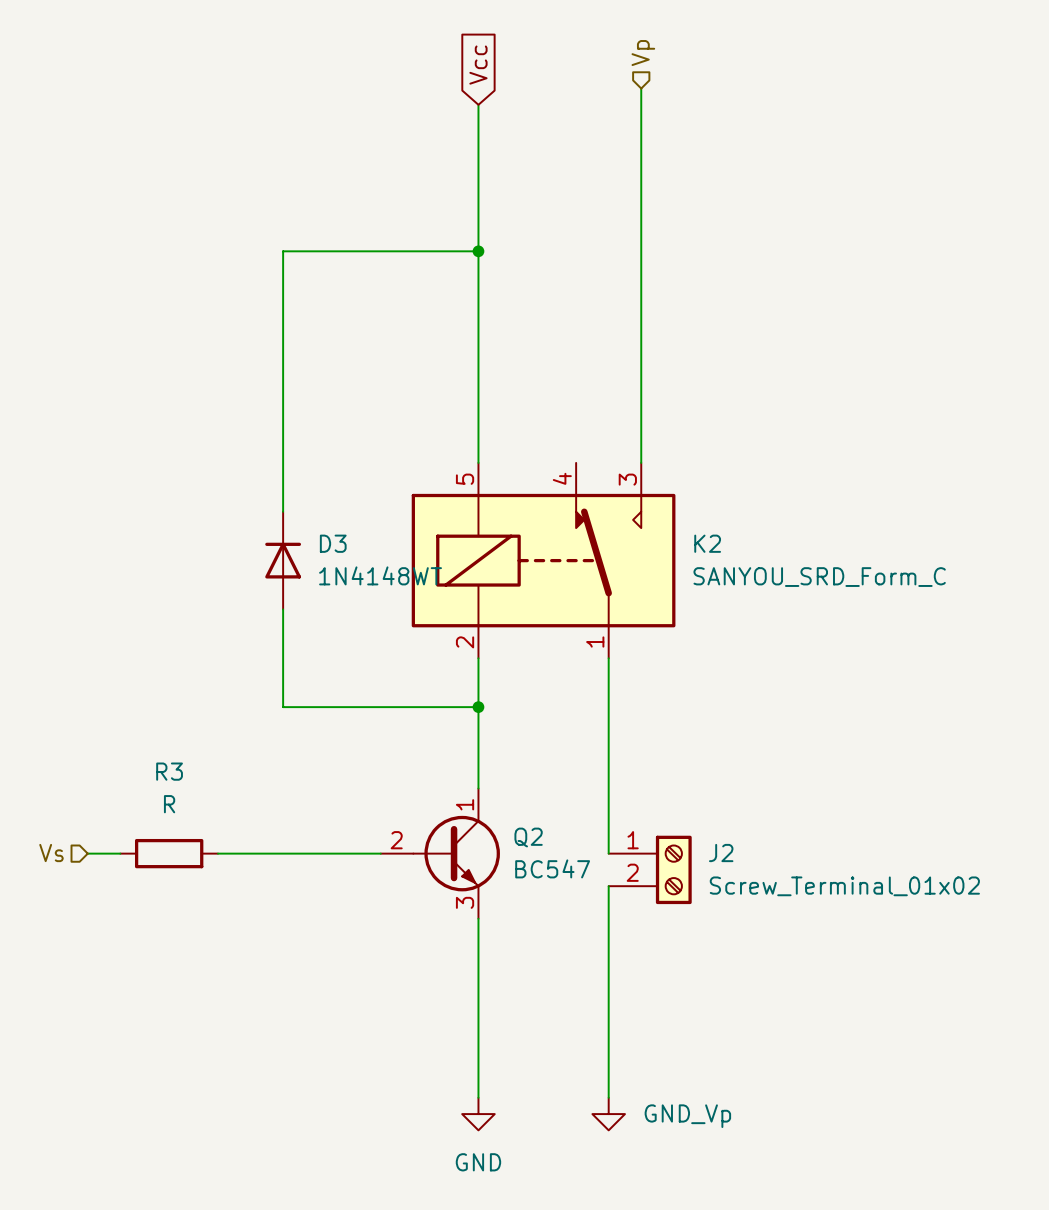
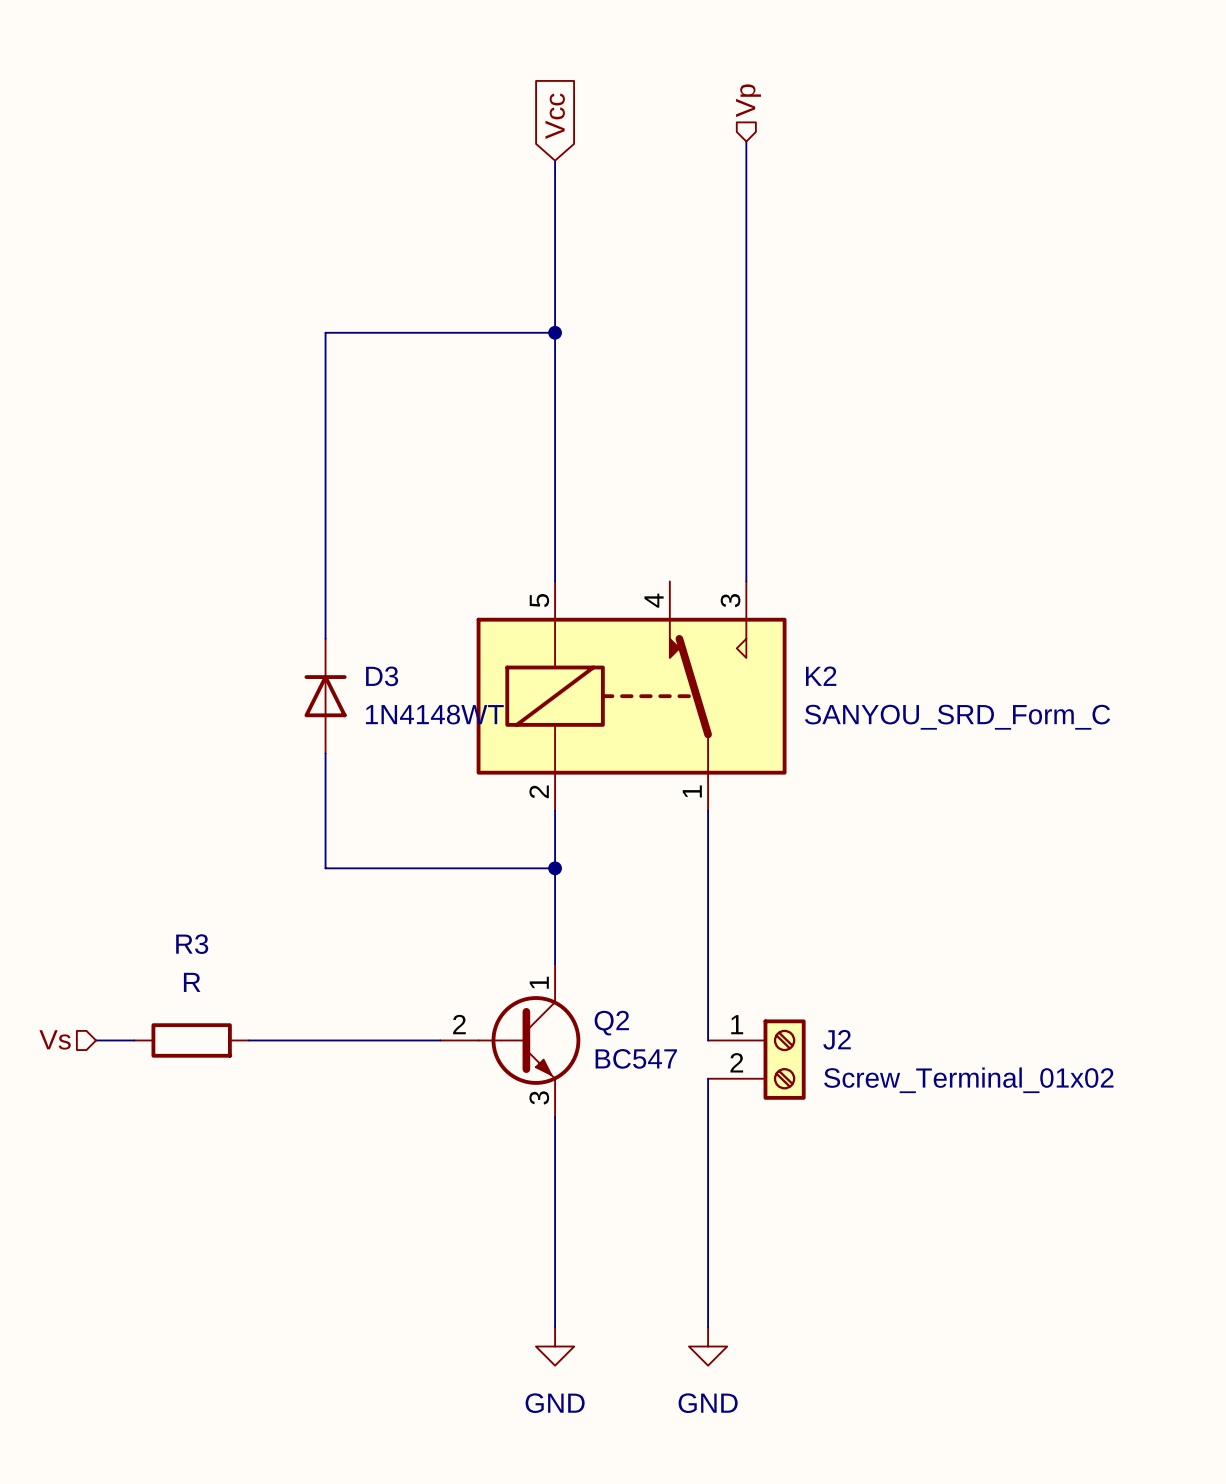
power symbol: GND_Vp (608, 1114) -> GND (708, 1346)

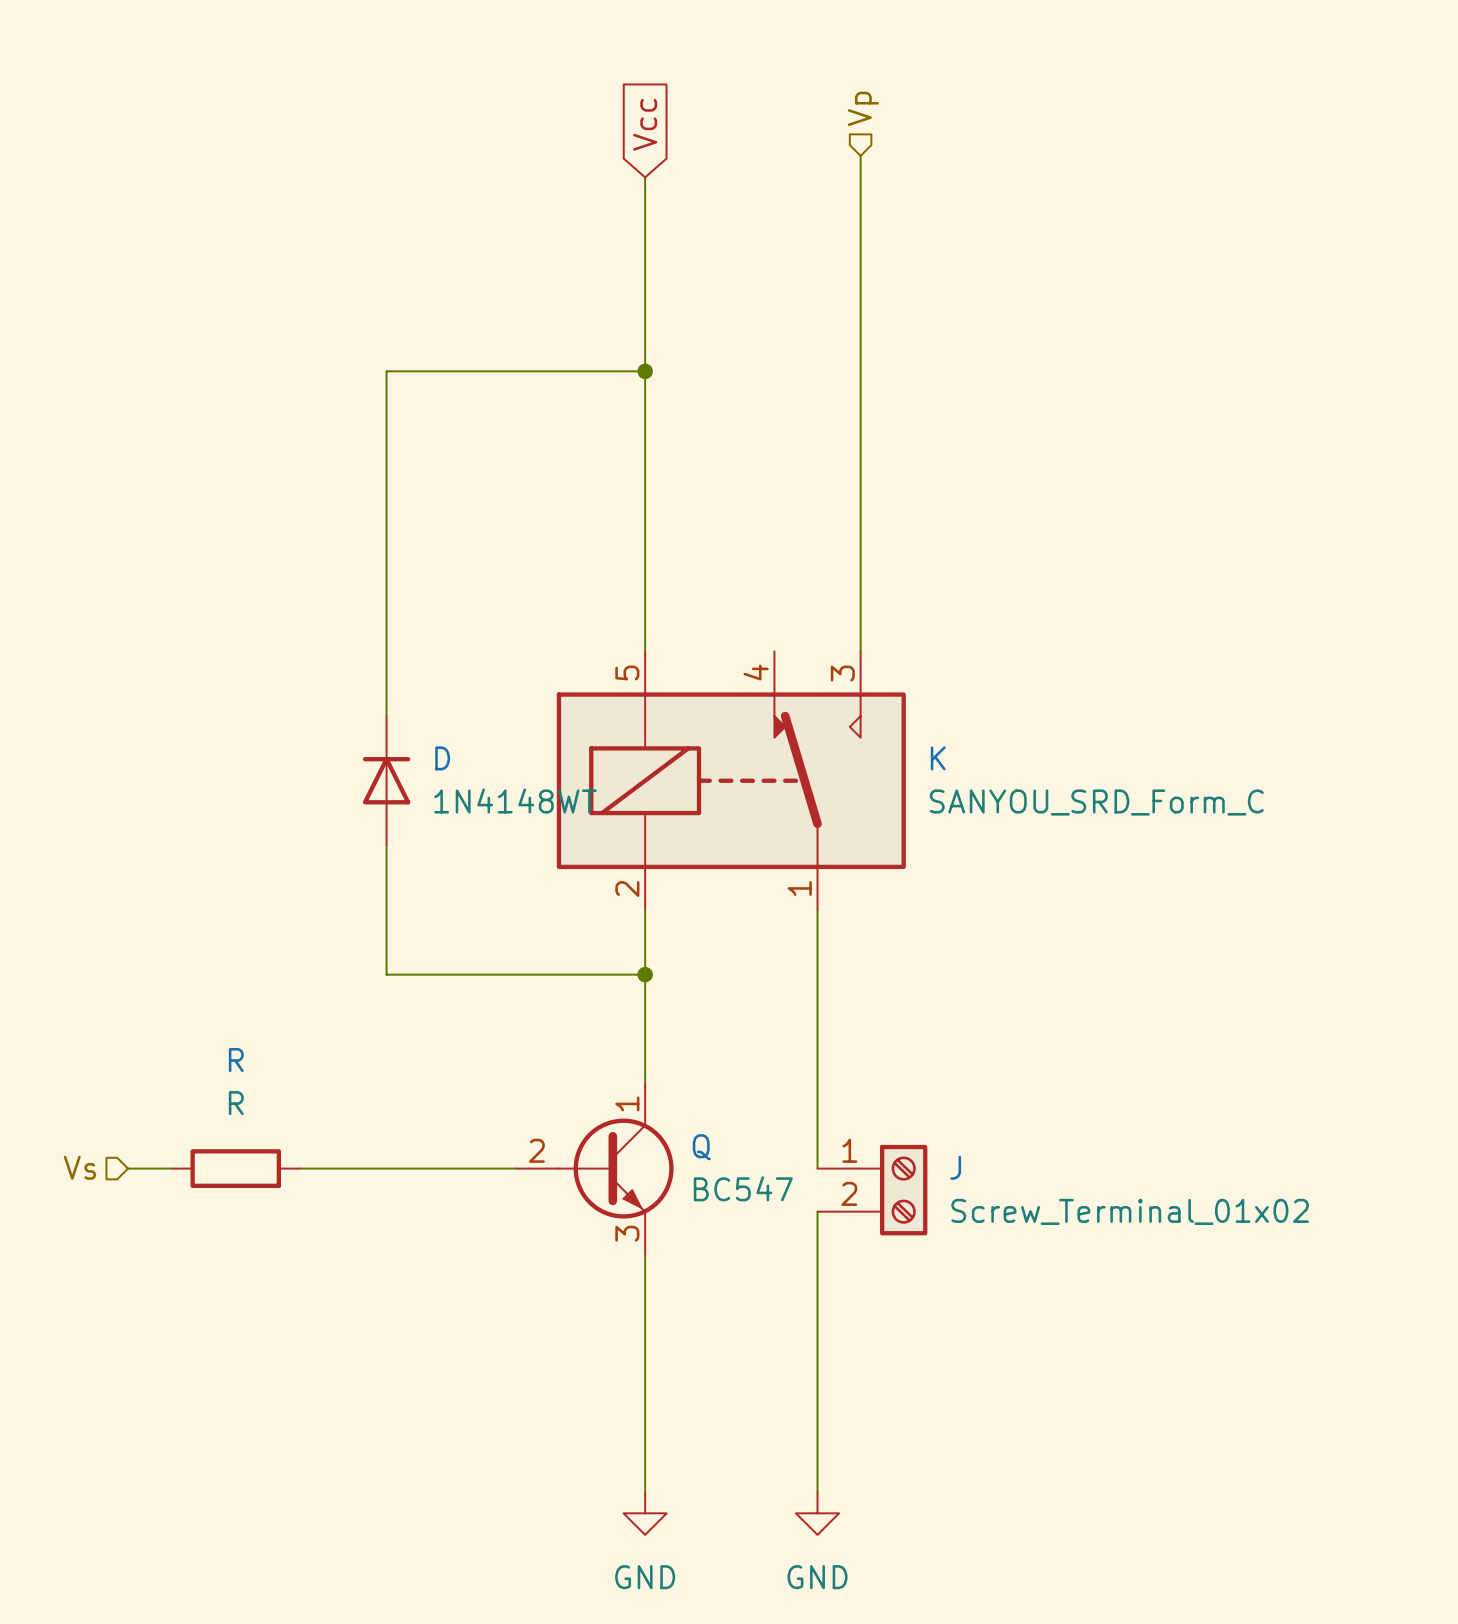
D3 name: D3 (382, 676) -> D (442, 758)
K2 name: K2 (821, 676) -> K (938, 758)
R3 name: R3 (192, 944) -> R (236, 1060)
Q2 name: Q2 (611, 1023) -> Q (701, 1147)
J2 name: J2 (837, 1039) -> J (955, 1167)

